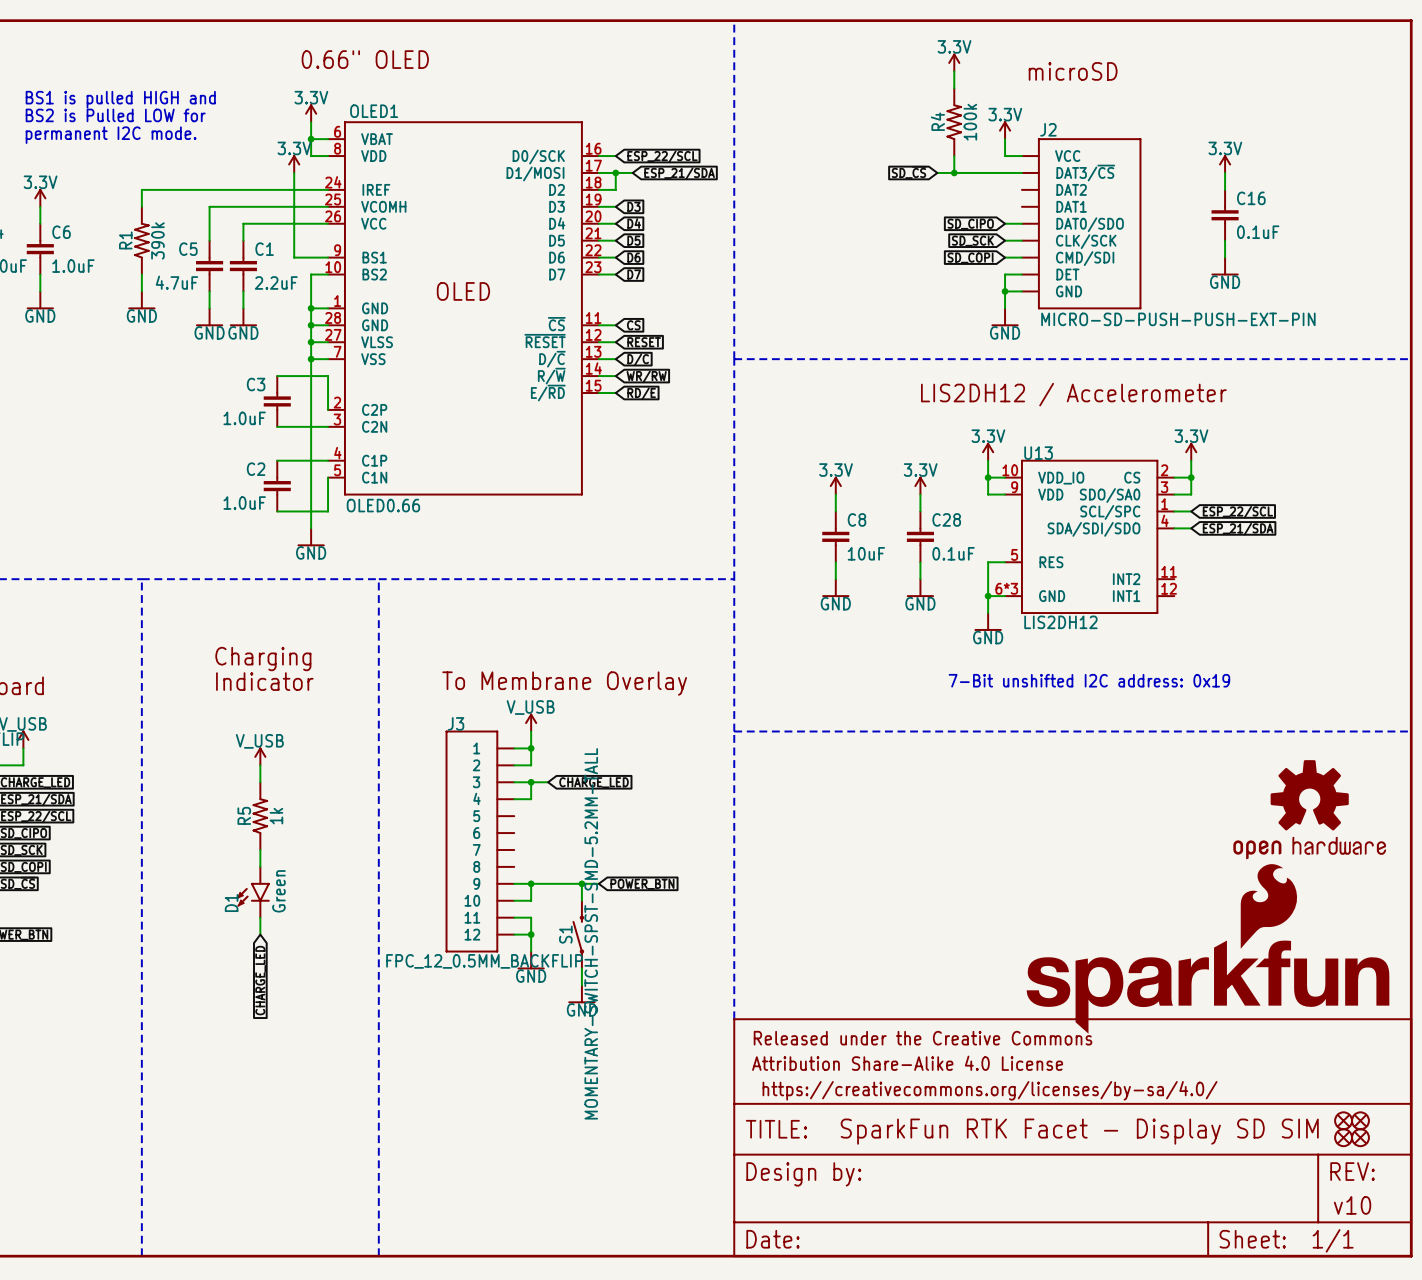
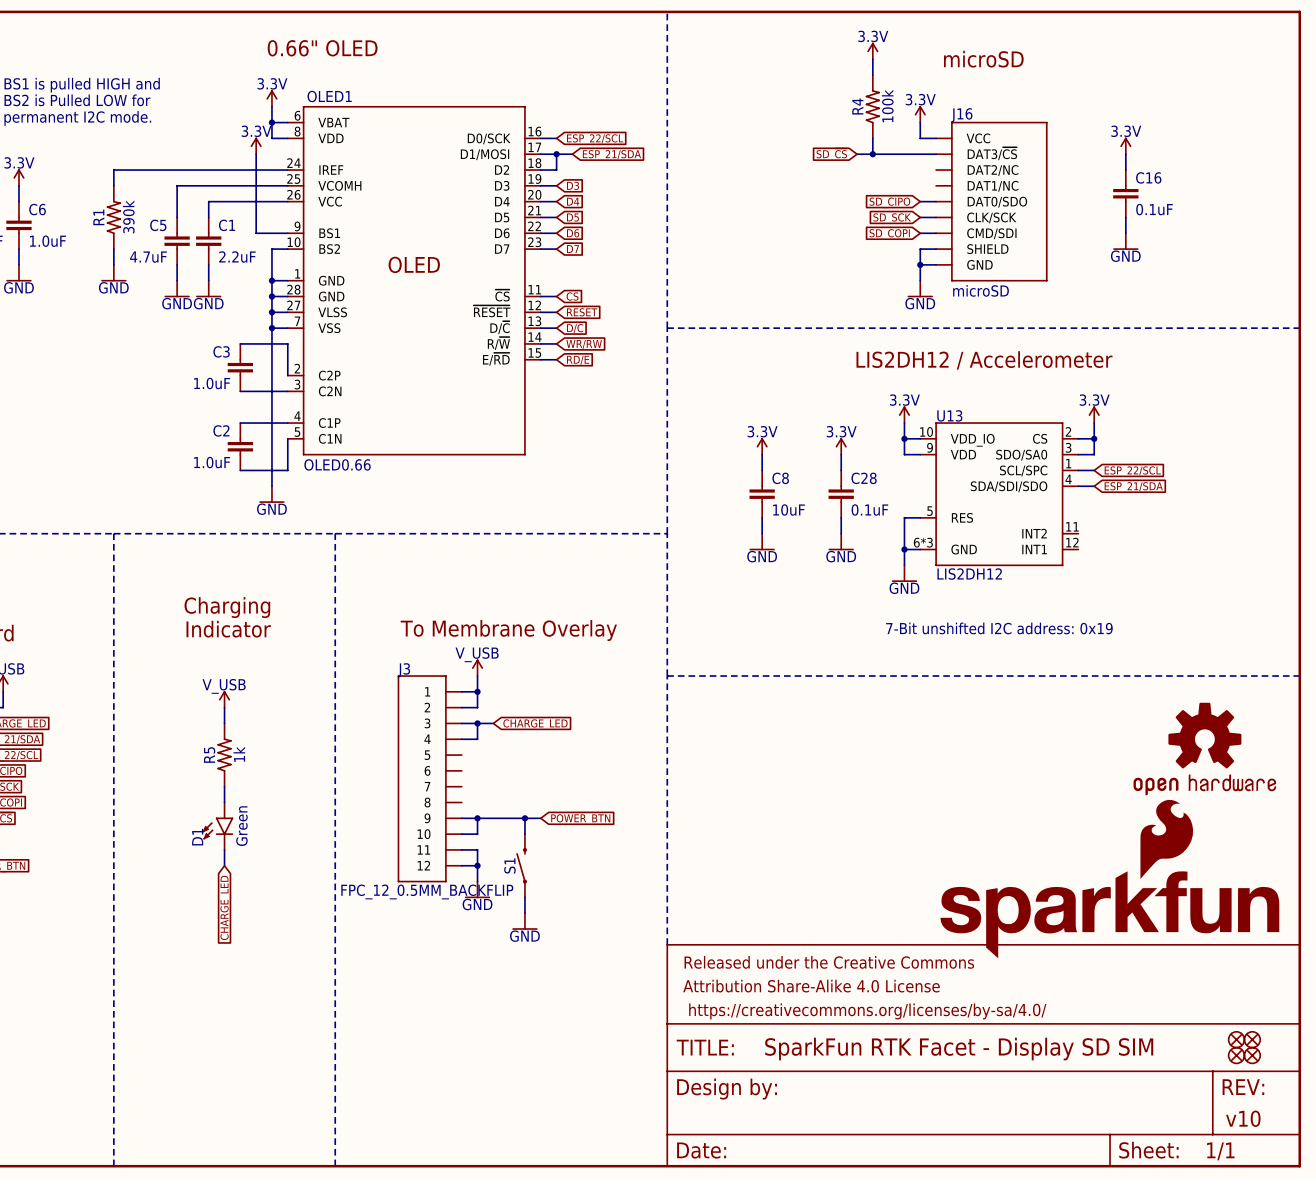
J2 name: J2 (1048, 129) -> J16 (961, 115)
J2 pin name: DAT2 (1071, 189) -> DAT2/NC (993, 170)
J2 pin name: DAT1 (1071, 206) -> DAT1/NC (993, 186)
J2 pin name: DET (1067, 274) -> SHIELD (987, 249)
J2 value: MICRO-SD-PUSH-PUSH-EXT-PIN (1178, 319) -> microSD (981, 290)
S1 value: MOMENTARY-SWITCH-SPST-SMD-5.2MM-TALL (591, 933) -> none

